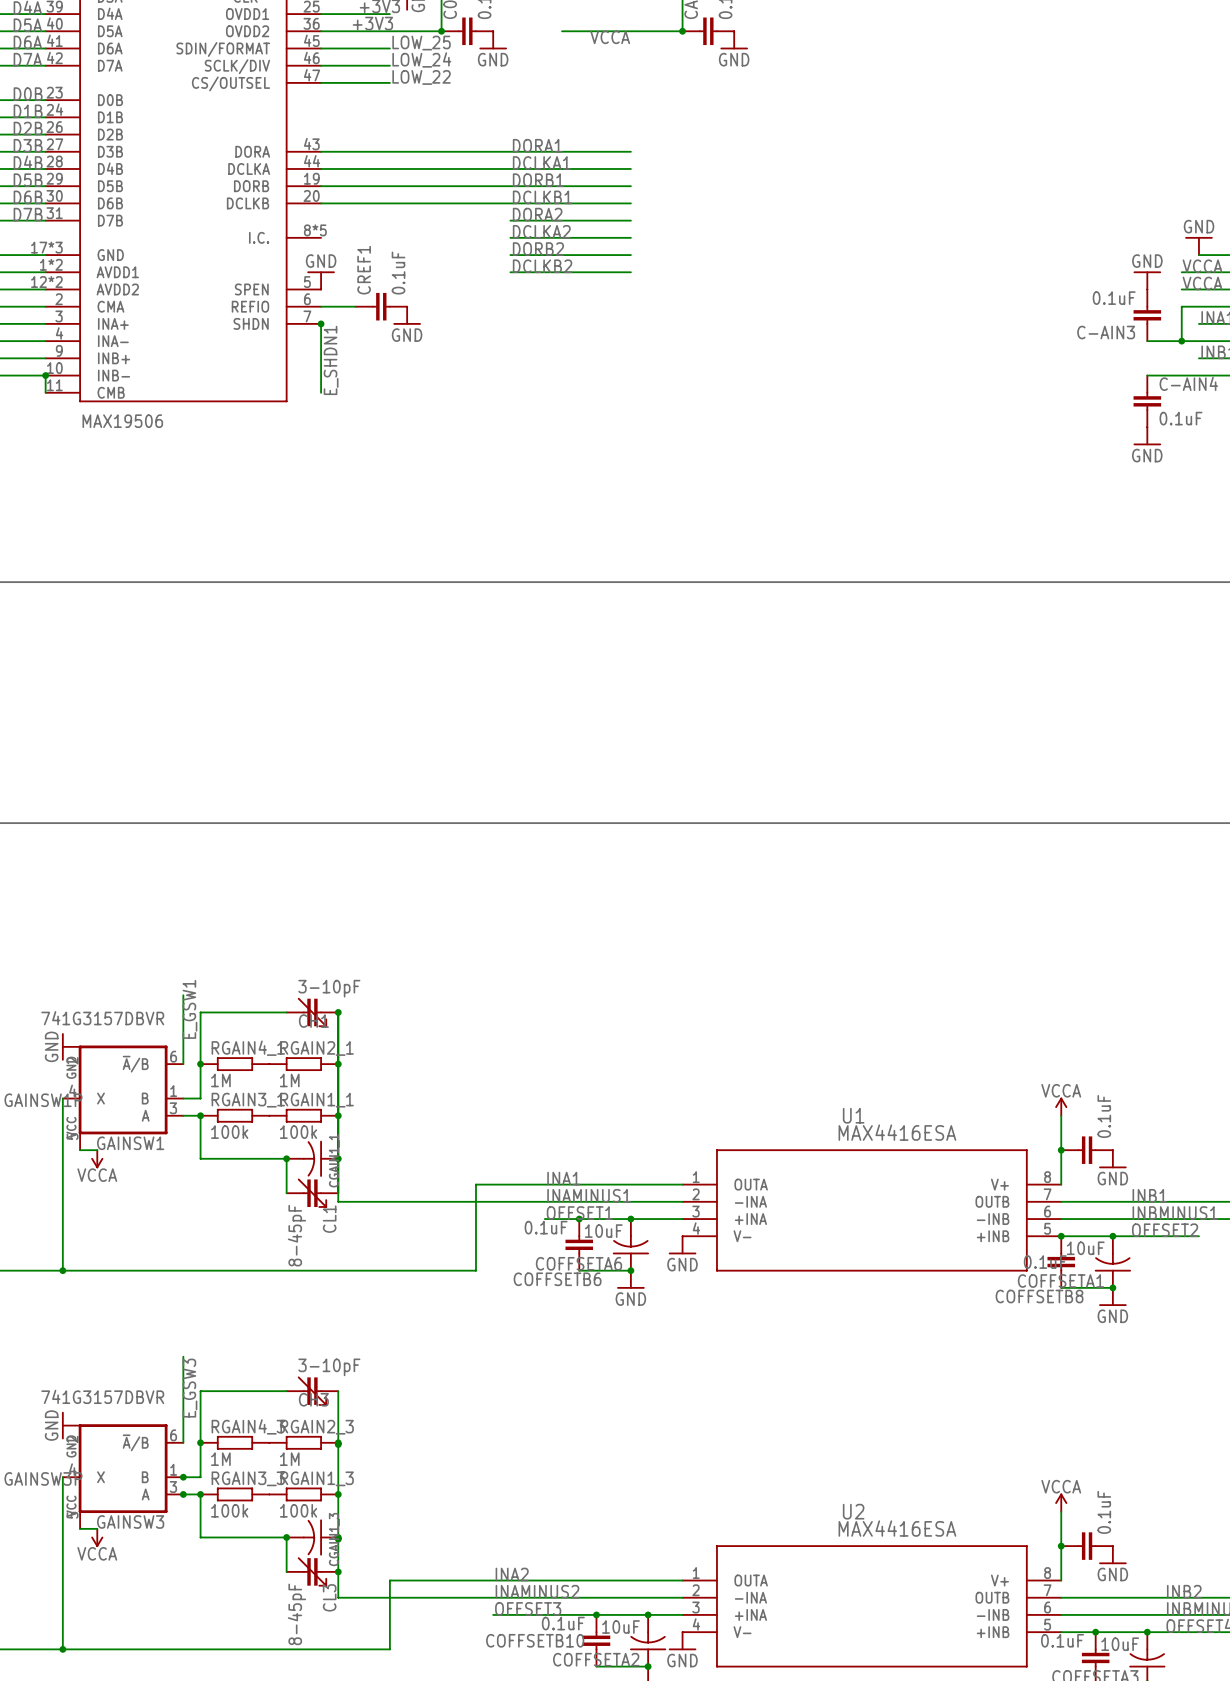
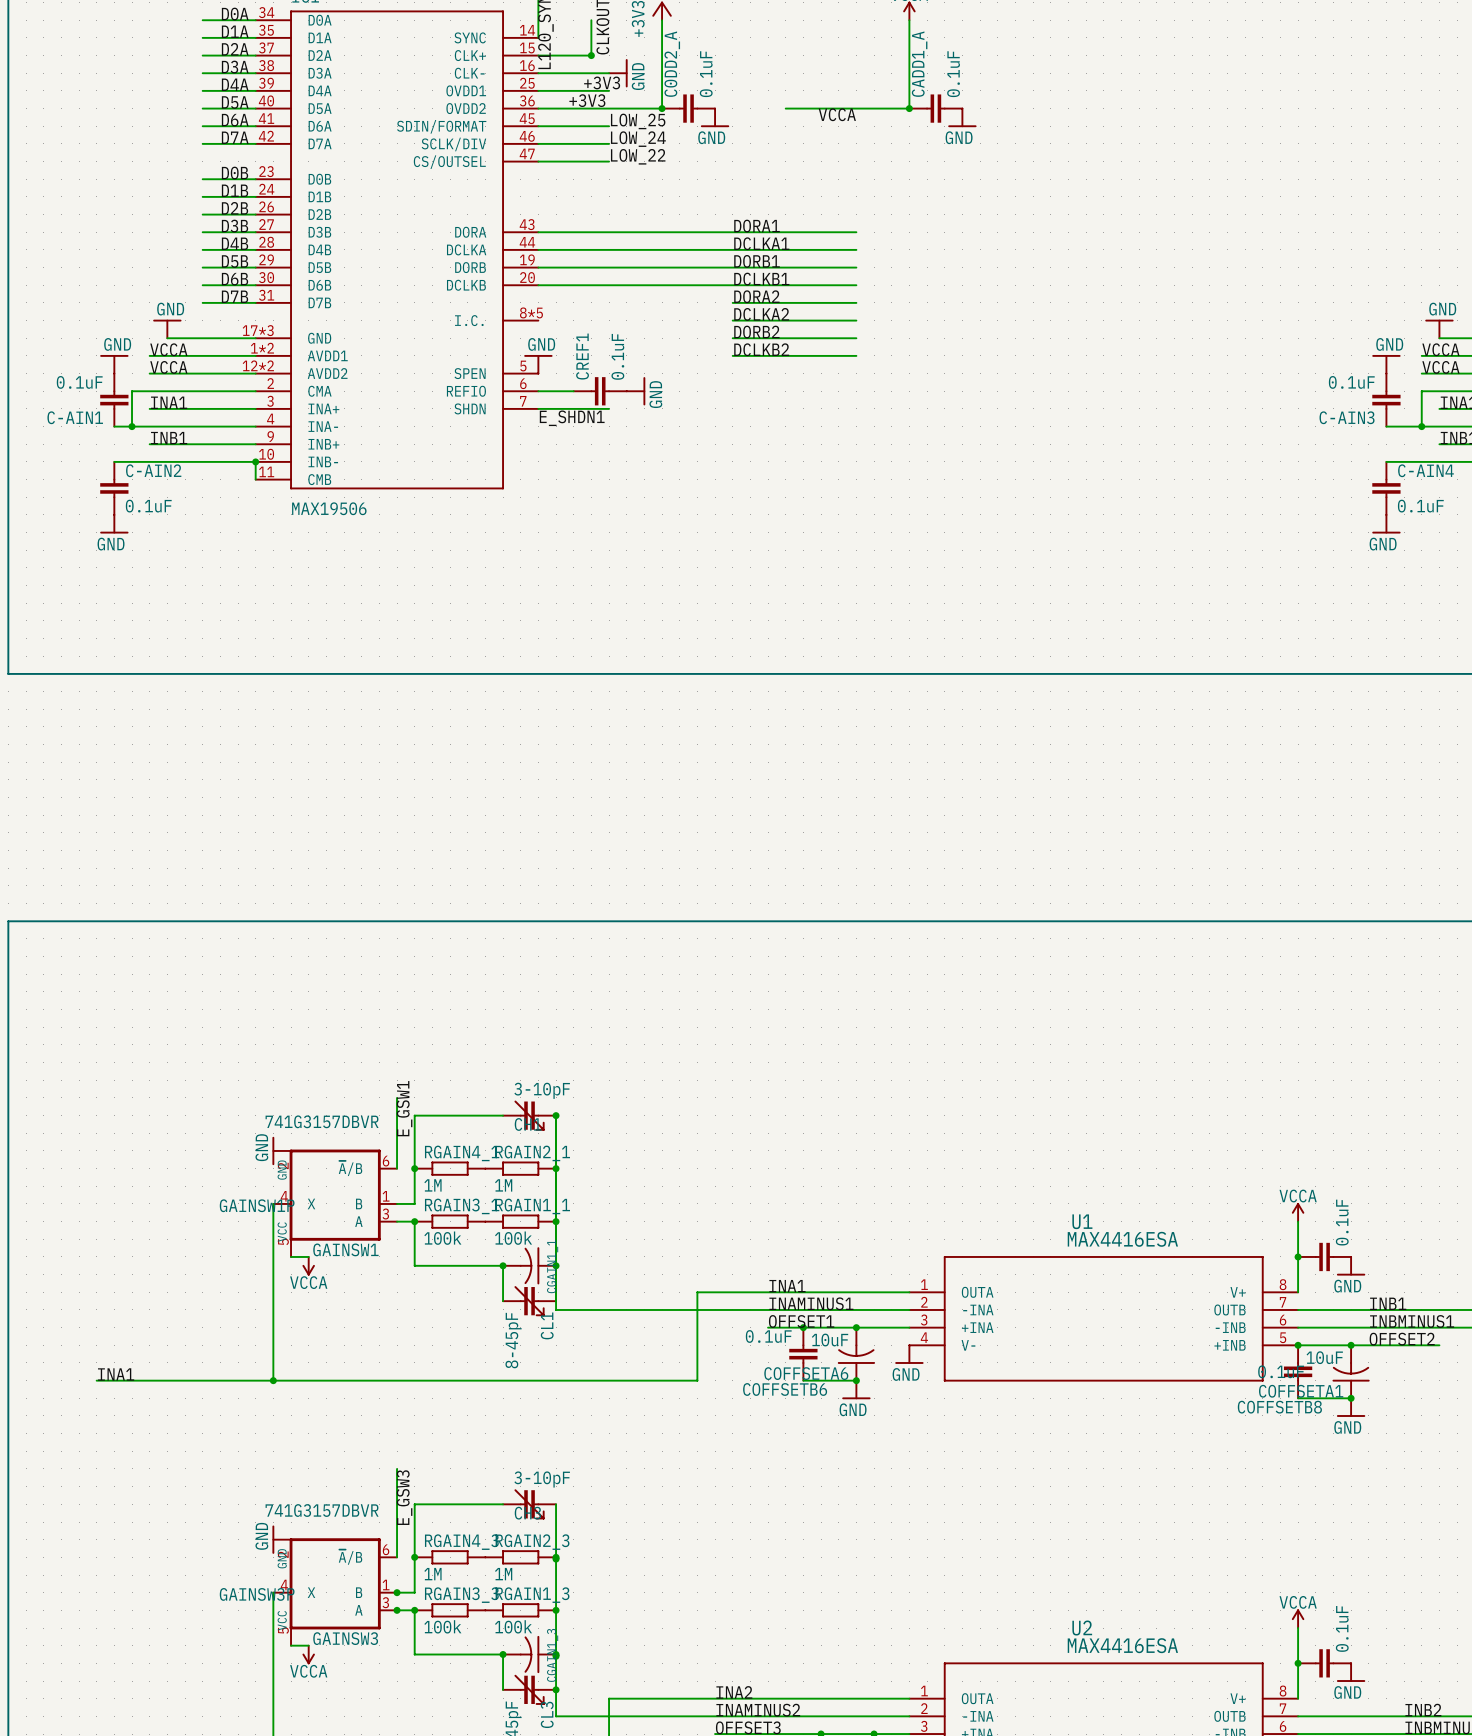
wire: (321, 323) (321, 392) -> (538, 408) (609, 408)
junction: (321, 323) -> none
power symbol rotation: 0° (407, 323) -> 90° counterclockwise (644, 391)
label rotation: 0° (331, 360) -> 90° clockwise (572, 418)

